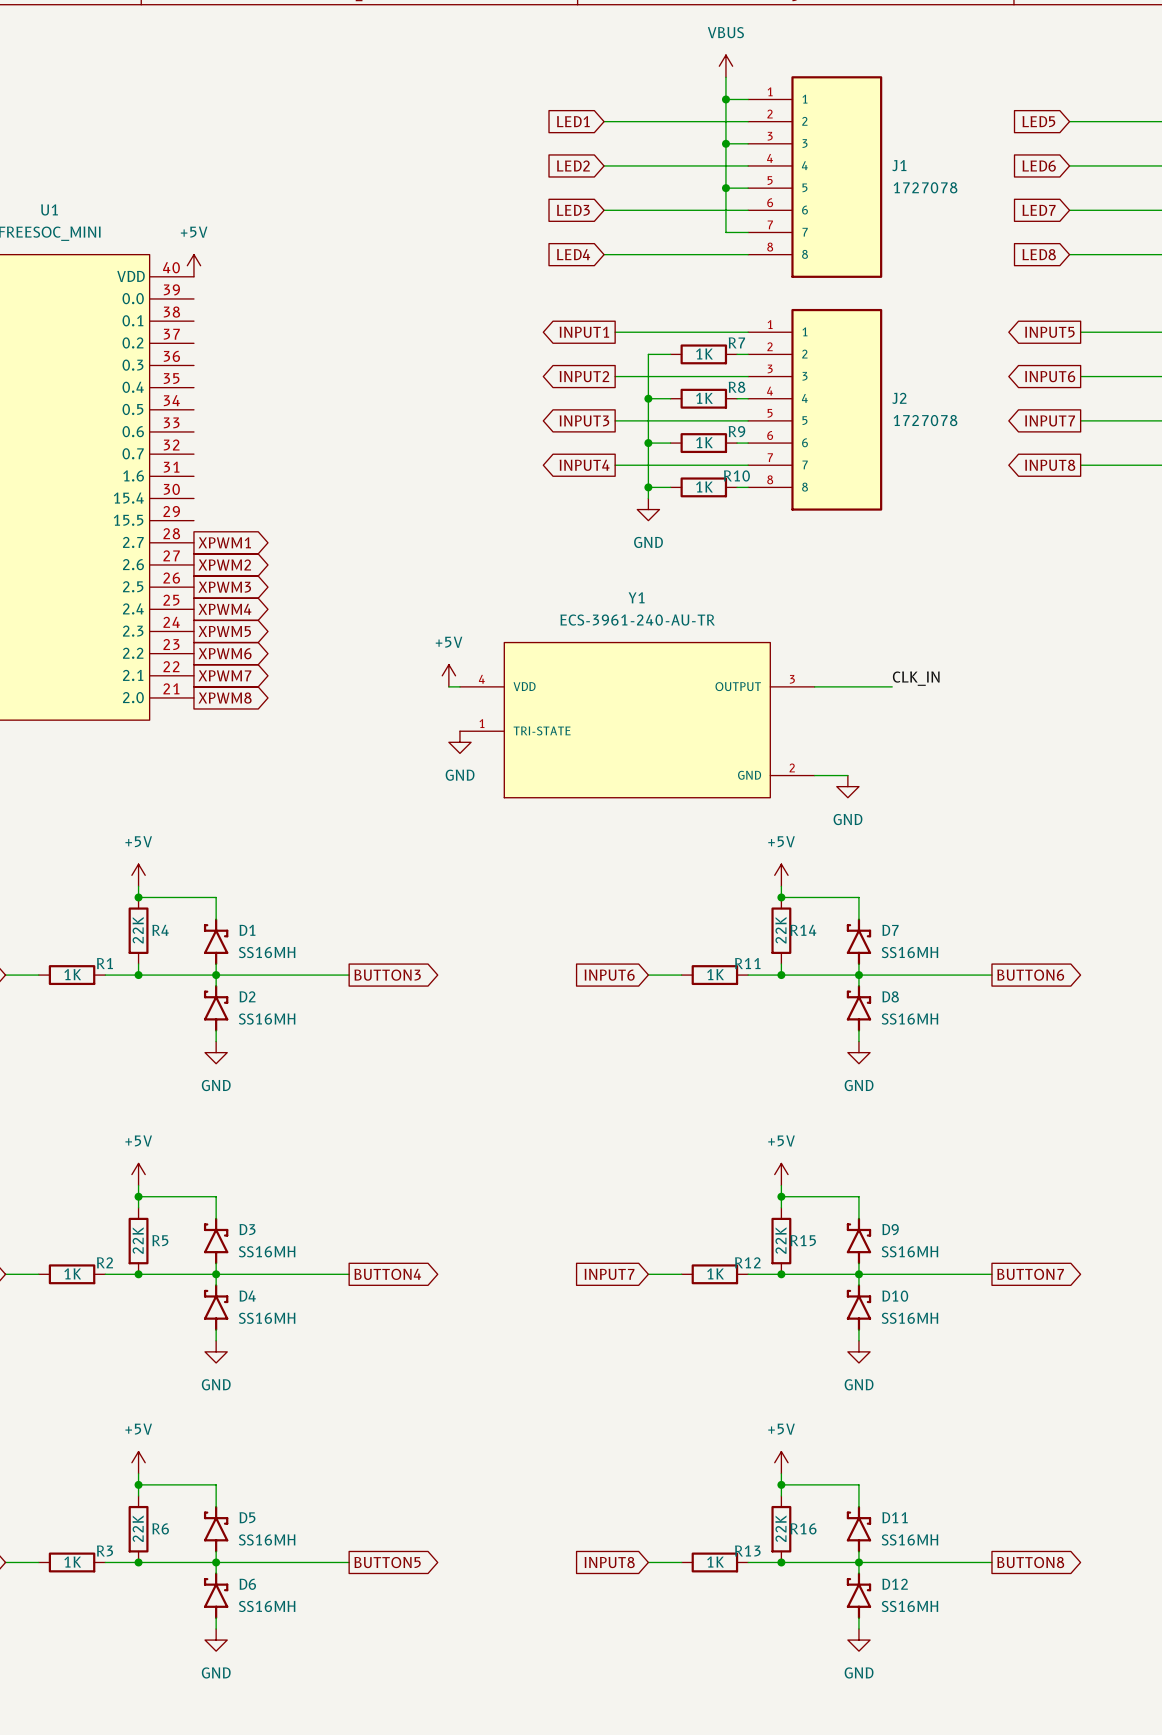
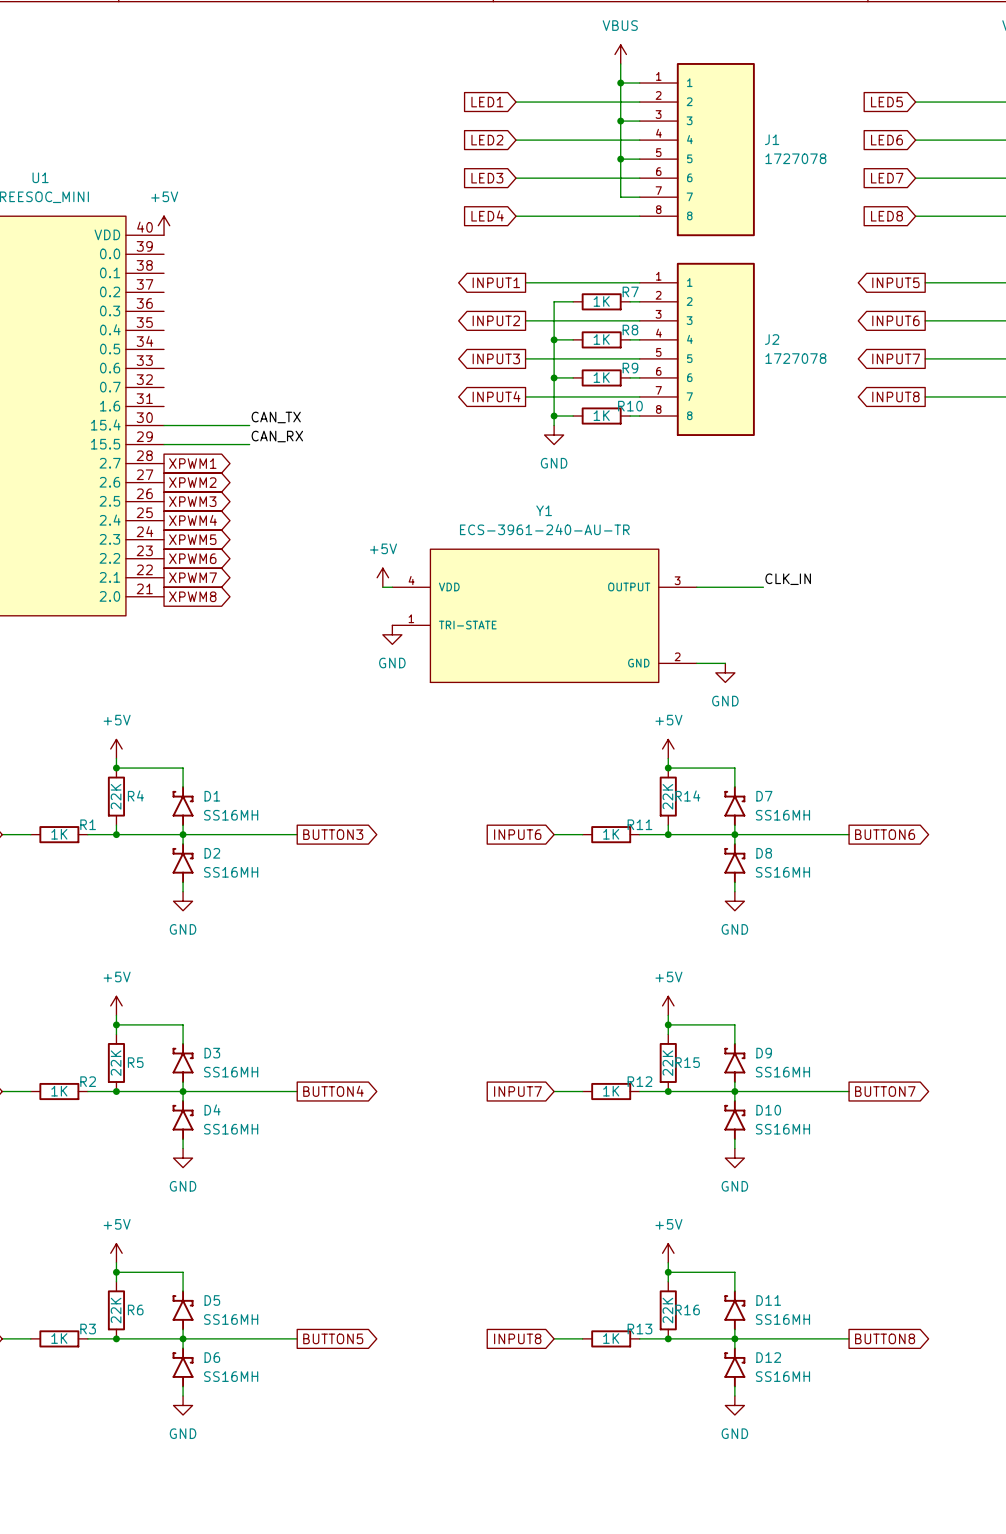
label: none -> CAN_TX (276, 417)
wire: none -> (164, 425) (249, 425)
label: none -> CAN_RX (277, 436)
wire: none -> (164, 444) (249, 444)

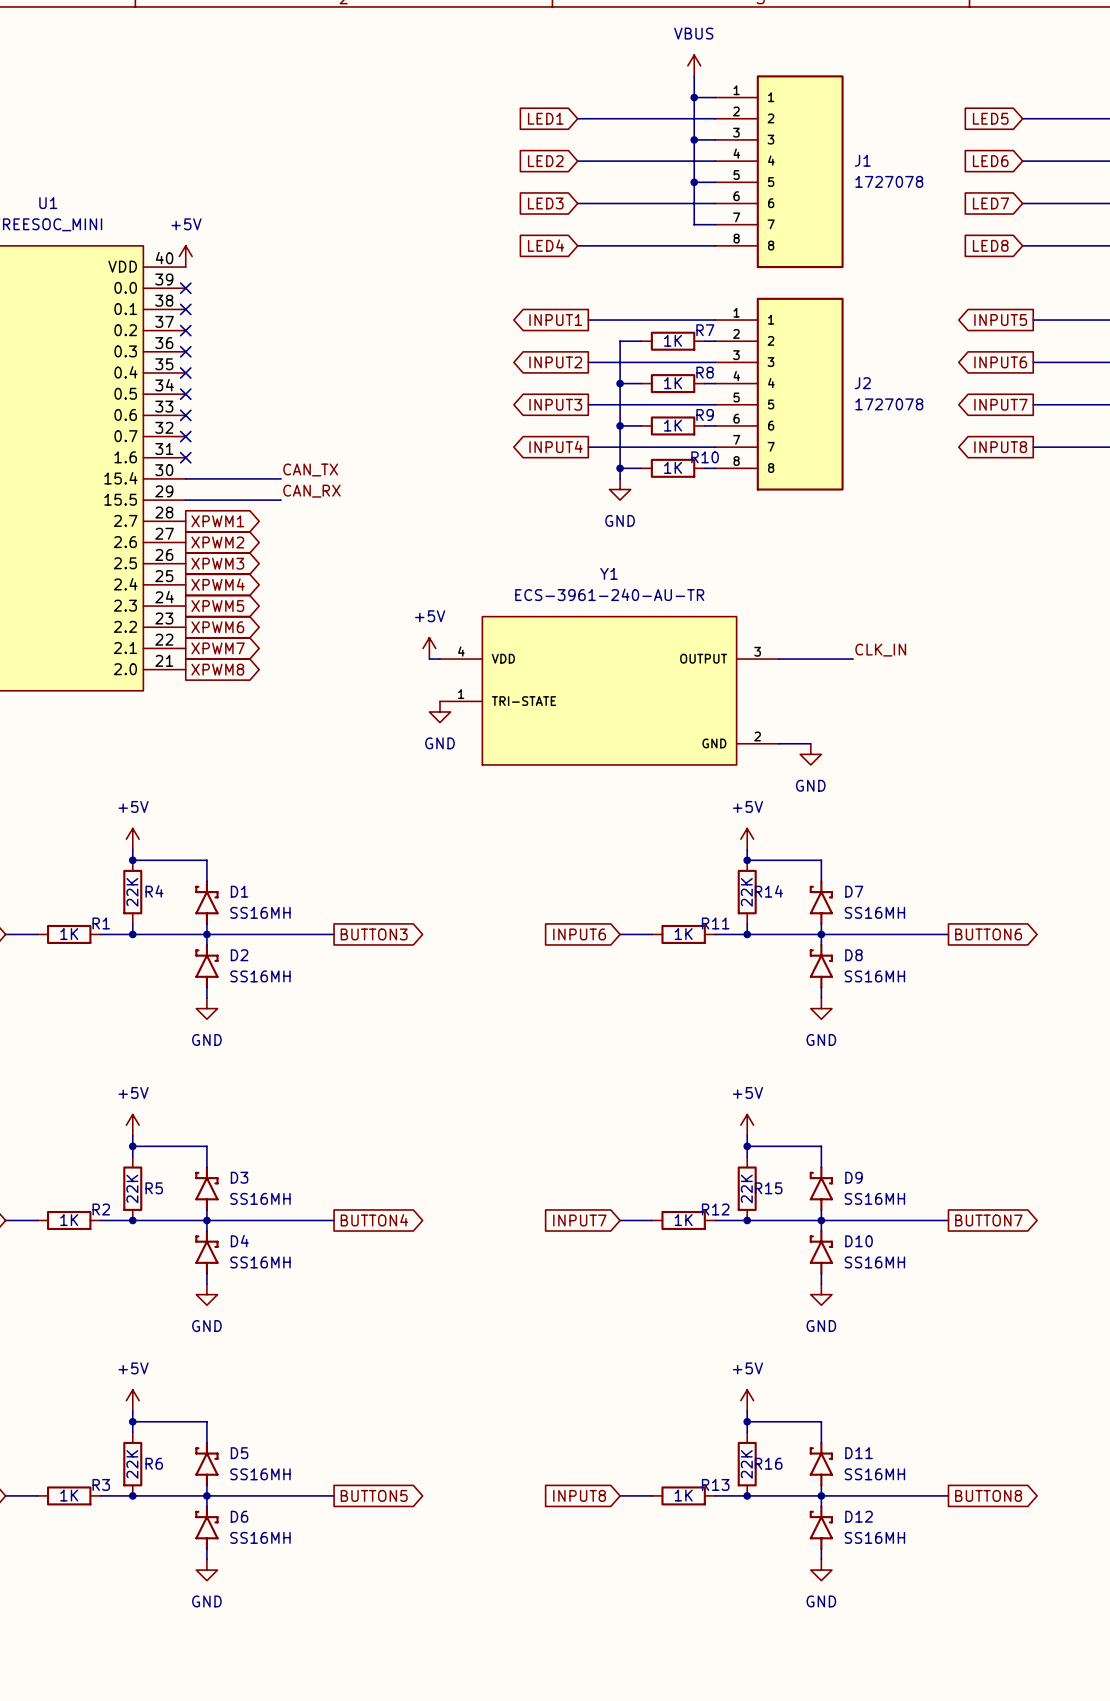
no-connect mark: none -> (185, 288)
no-connect mark: none -> (185, 309)
no-connect mark: none -> (185, 330)
no-connect mark: none -> (185, 351)
no-connect mark: none -> (185, 372)
no-connect mark: none -> (185, 394)
no-connect mark: none -> (185, 415)
no-connect mark: none -> (185, 436)
no-connect mark: none -> (185, 457)

